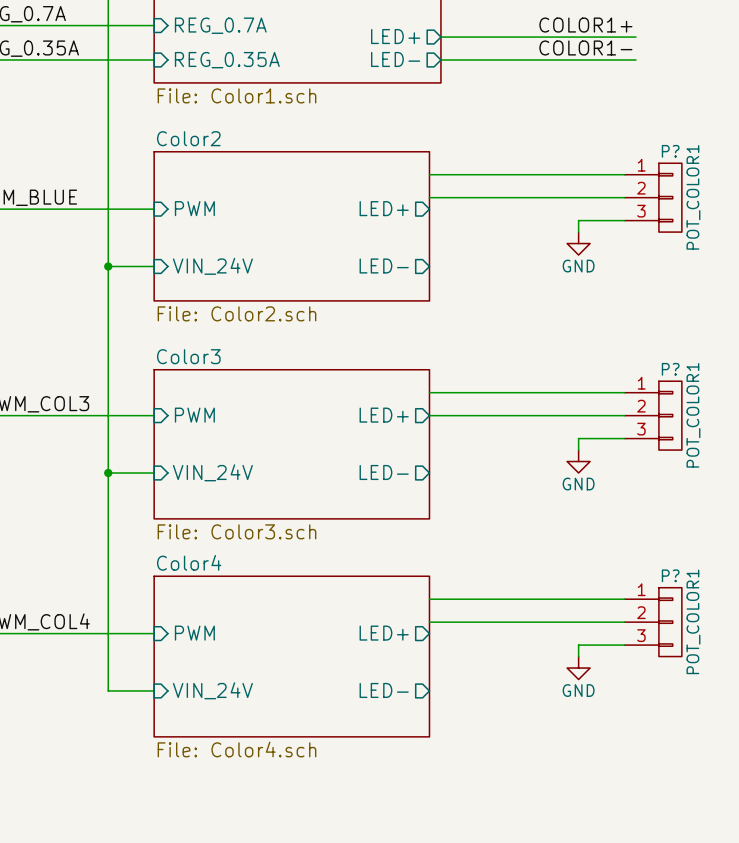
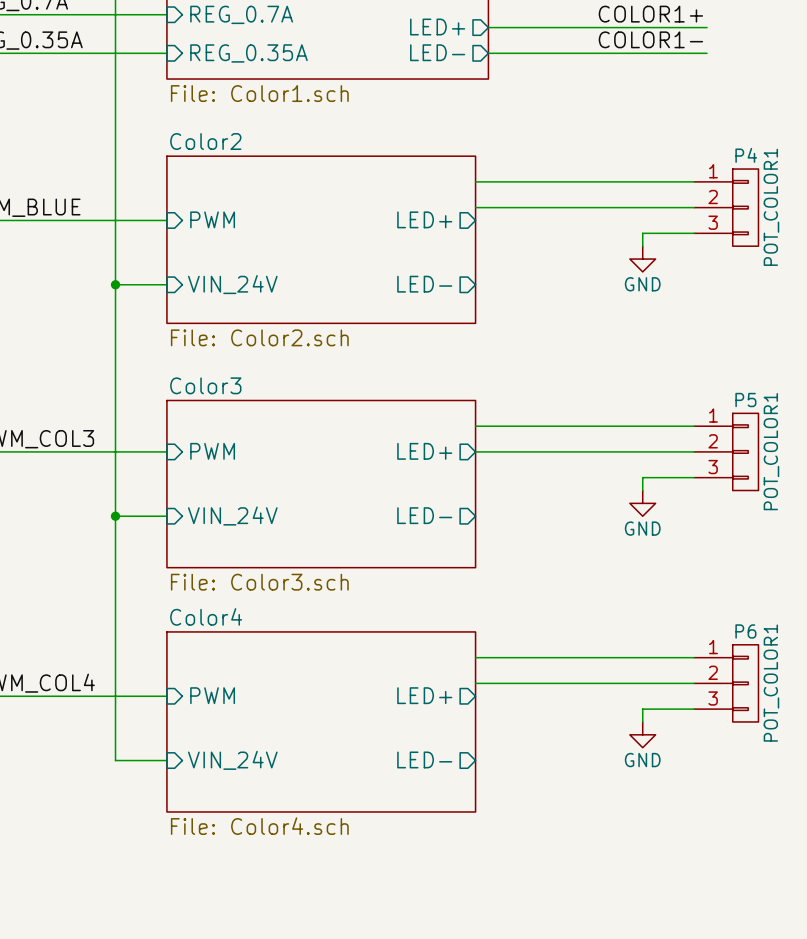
P? name: P? (670, 151) -> P4 (746, 155)
P? name: P? (670, 369) -> P5 (745, 400)
P? name: P? (670, 575) -> P6 (745, 631)

